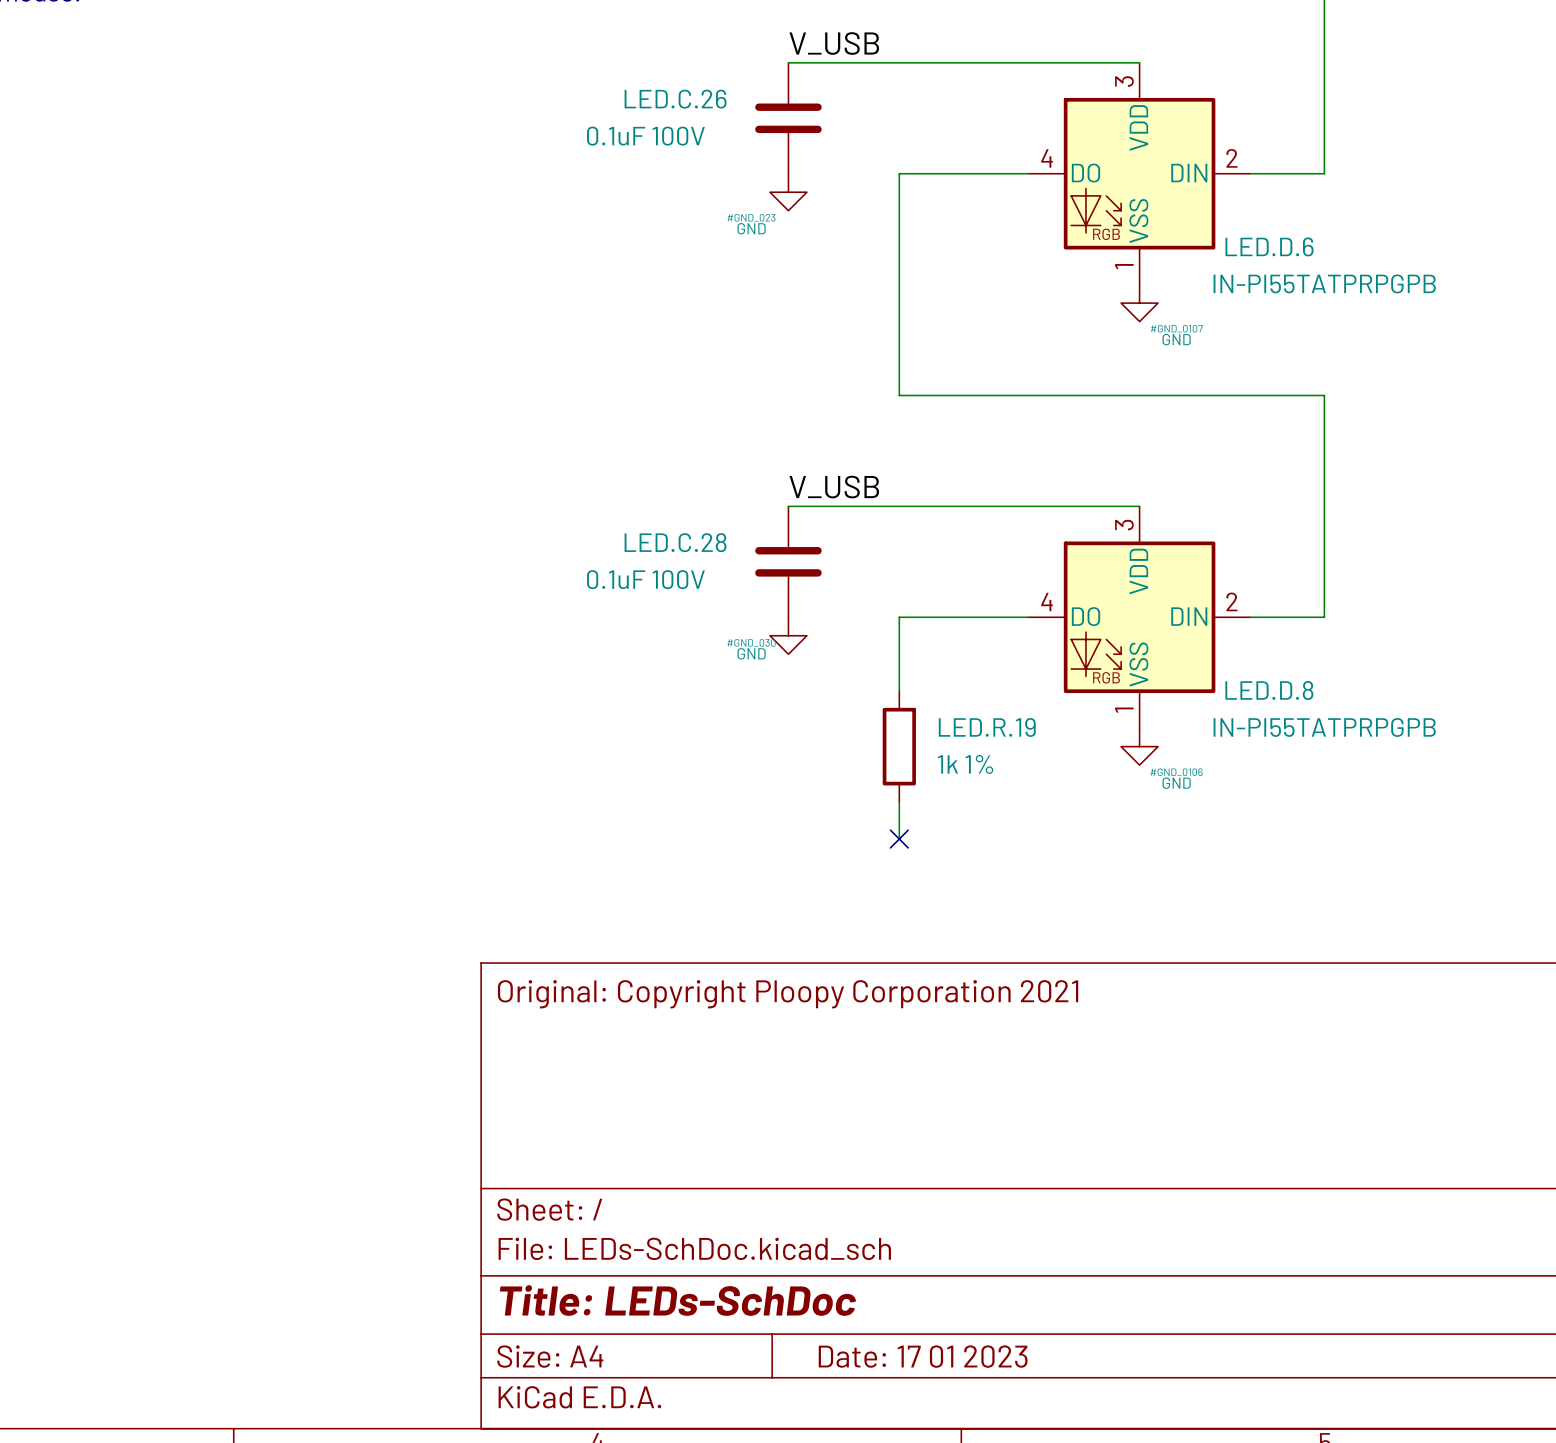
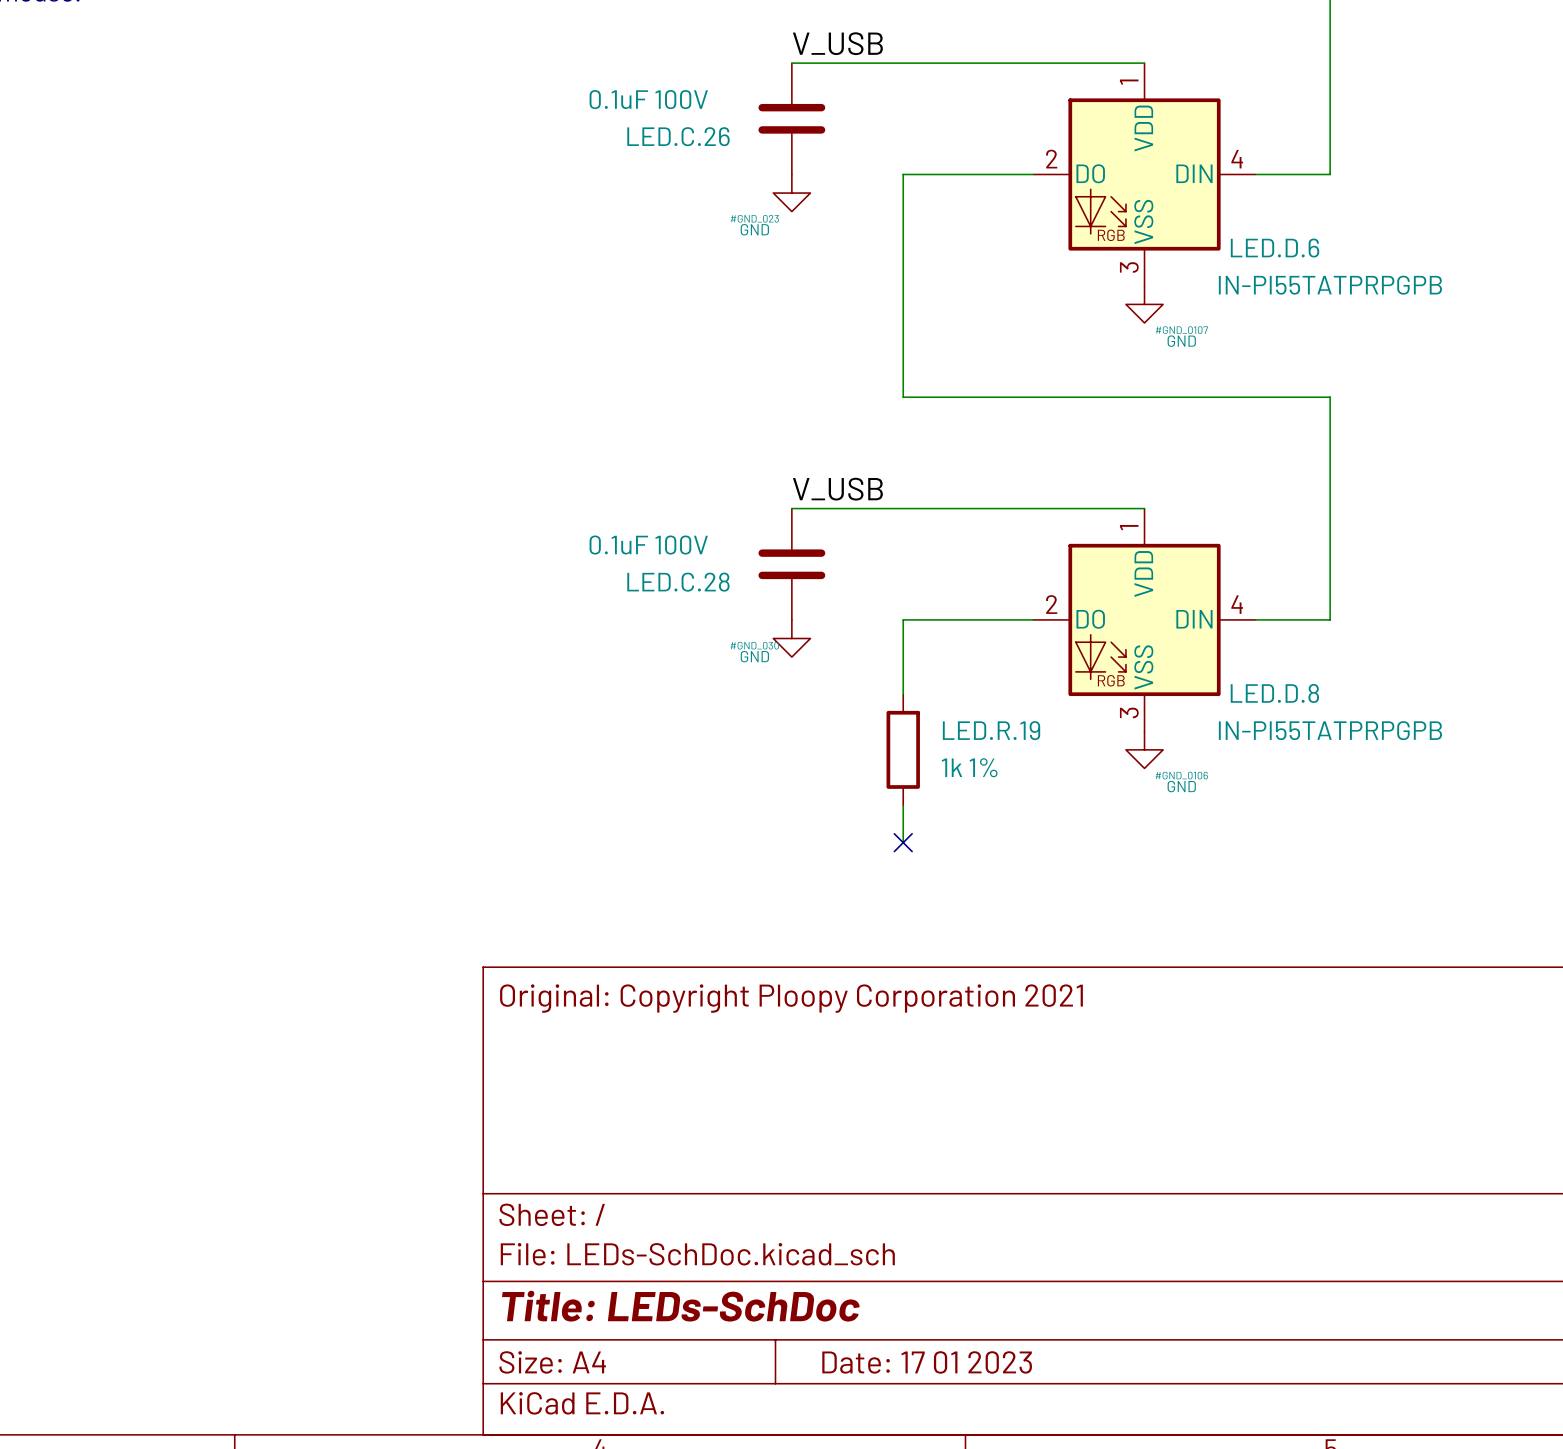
LED.D.6 pin number: 3 (1124, 81) -> 1 (1129, 82)
LED.C.26 name position: LED.C.26 (675, 99) -> LED.C.26 (678, 136)
LED.C.26 value position: 0.1uF 100V (645, 136) -> 0.1uF 100V (648, 99)
LED.D.6 pin number: 4 (1047, 158) -> 2 (1051, 159)
LED.D.6 pin number: 2 (1231, 158) -> 4 (1237, 159)
LED.D.6 pin number: 1 (1124, 266) -> 3 (1129, 267)
LED.D.8 pin number: 3 (1124, 525) -> 1 (1129, 527)
LED.C.28 name position: LED.C.28 (675, 542) -> LED.C.28 (678, 582)
LED.C.28 value position: 0.1uF 100V (645, 579) -> 0.1uF 100V (648, 545)
LED.D.8 pin number: 2 (1231, 601) -> 4 (1237, 604)
LED.D.8 pin number: 4 (1047, 602) -> 2 (1051, 604)
LED.D.8 pin number: 1 (1124, 710) -> 3 (1129, 712)

